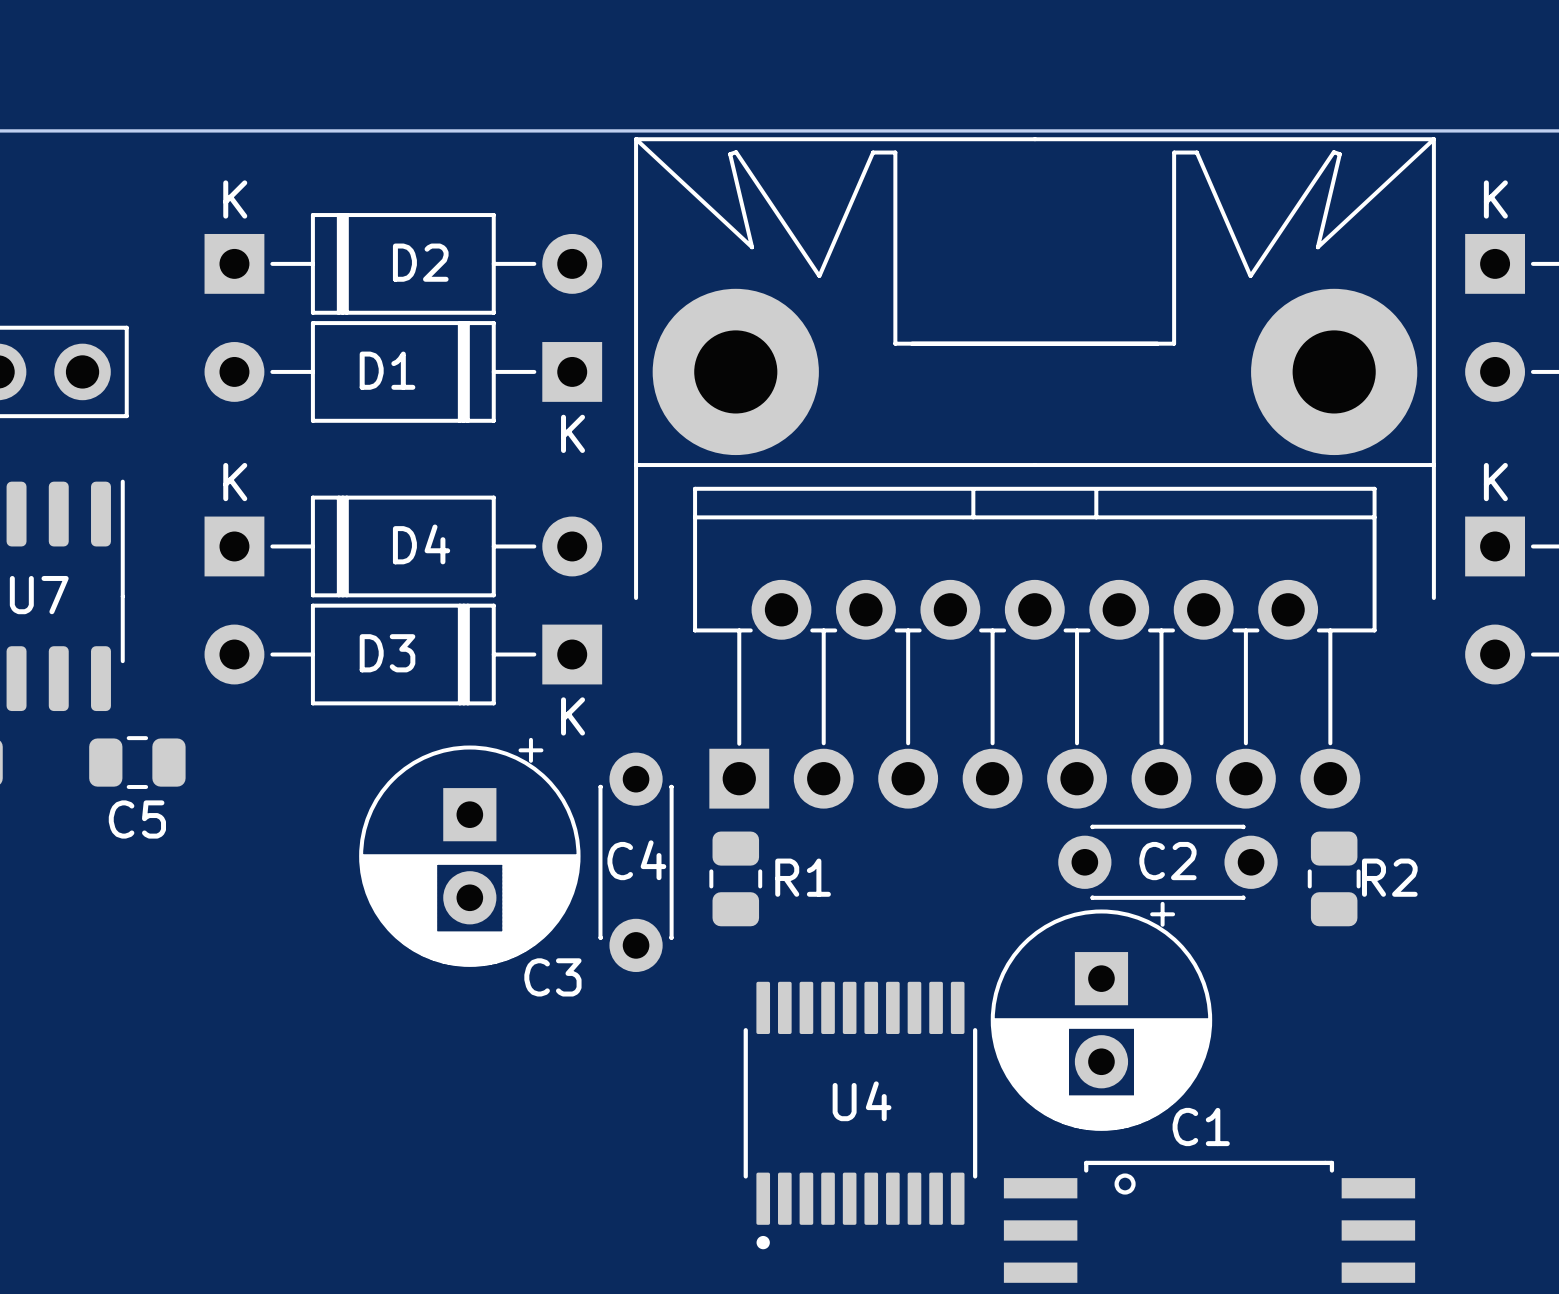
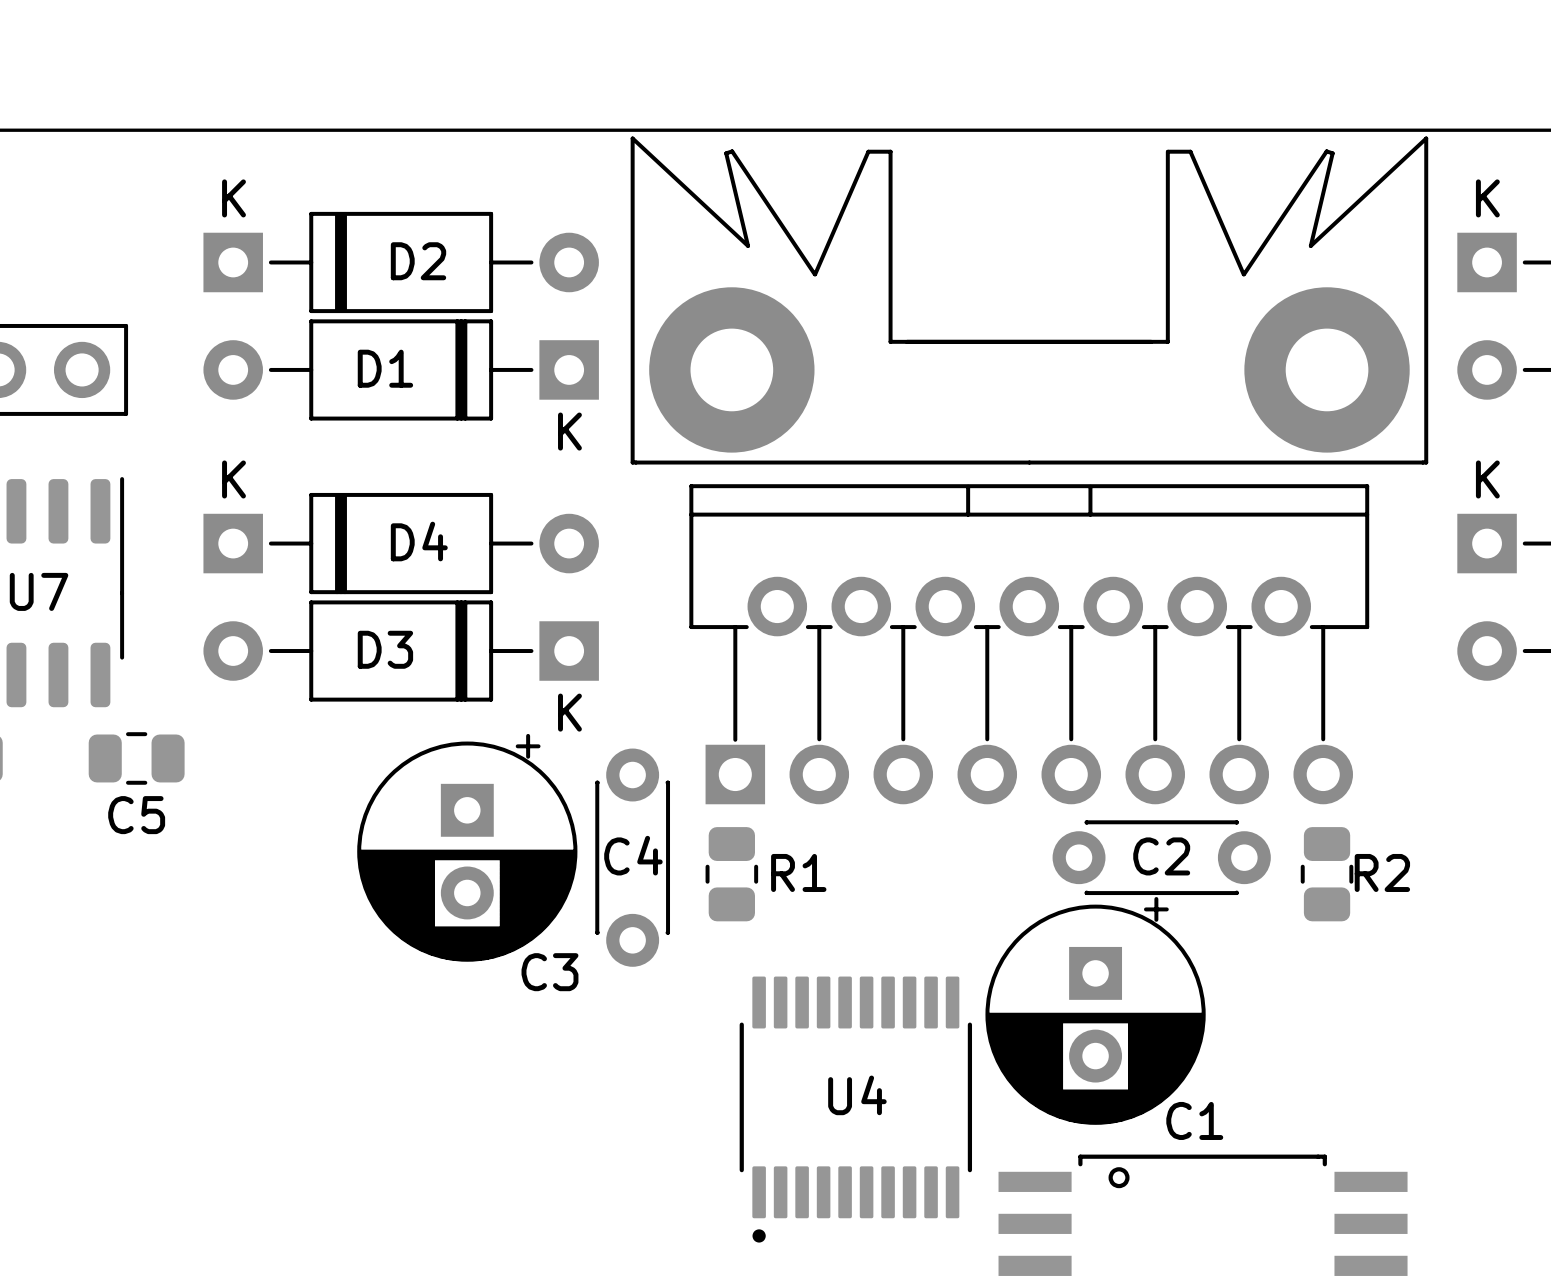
part: none -> (1029, 300)
part: (1034, 368) -> none

